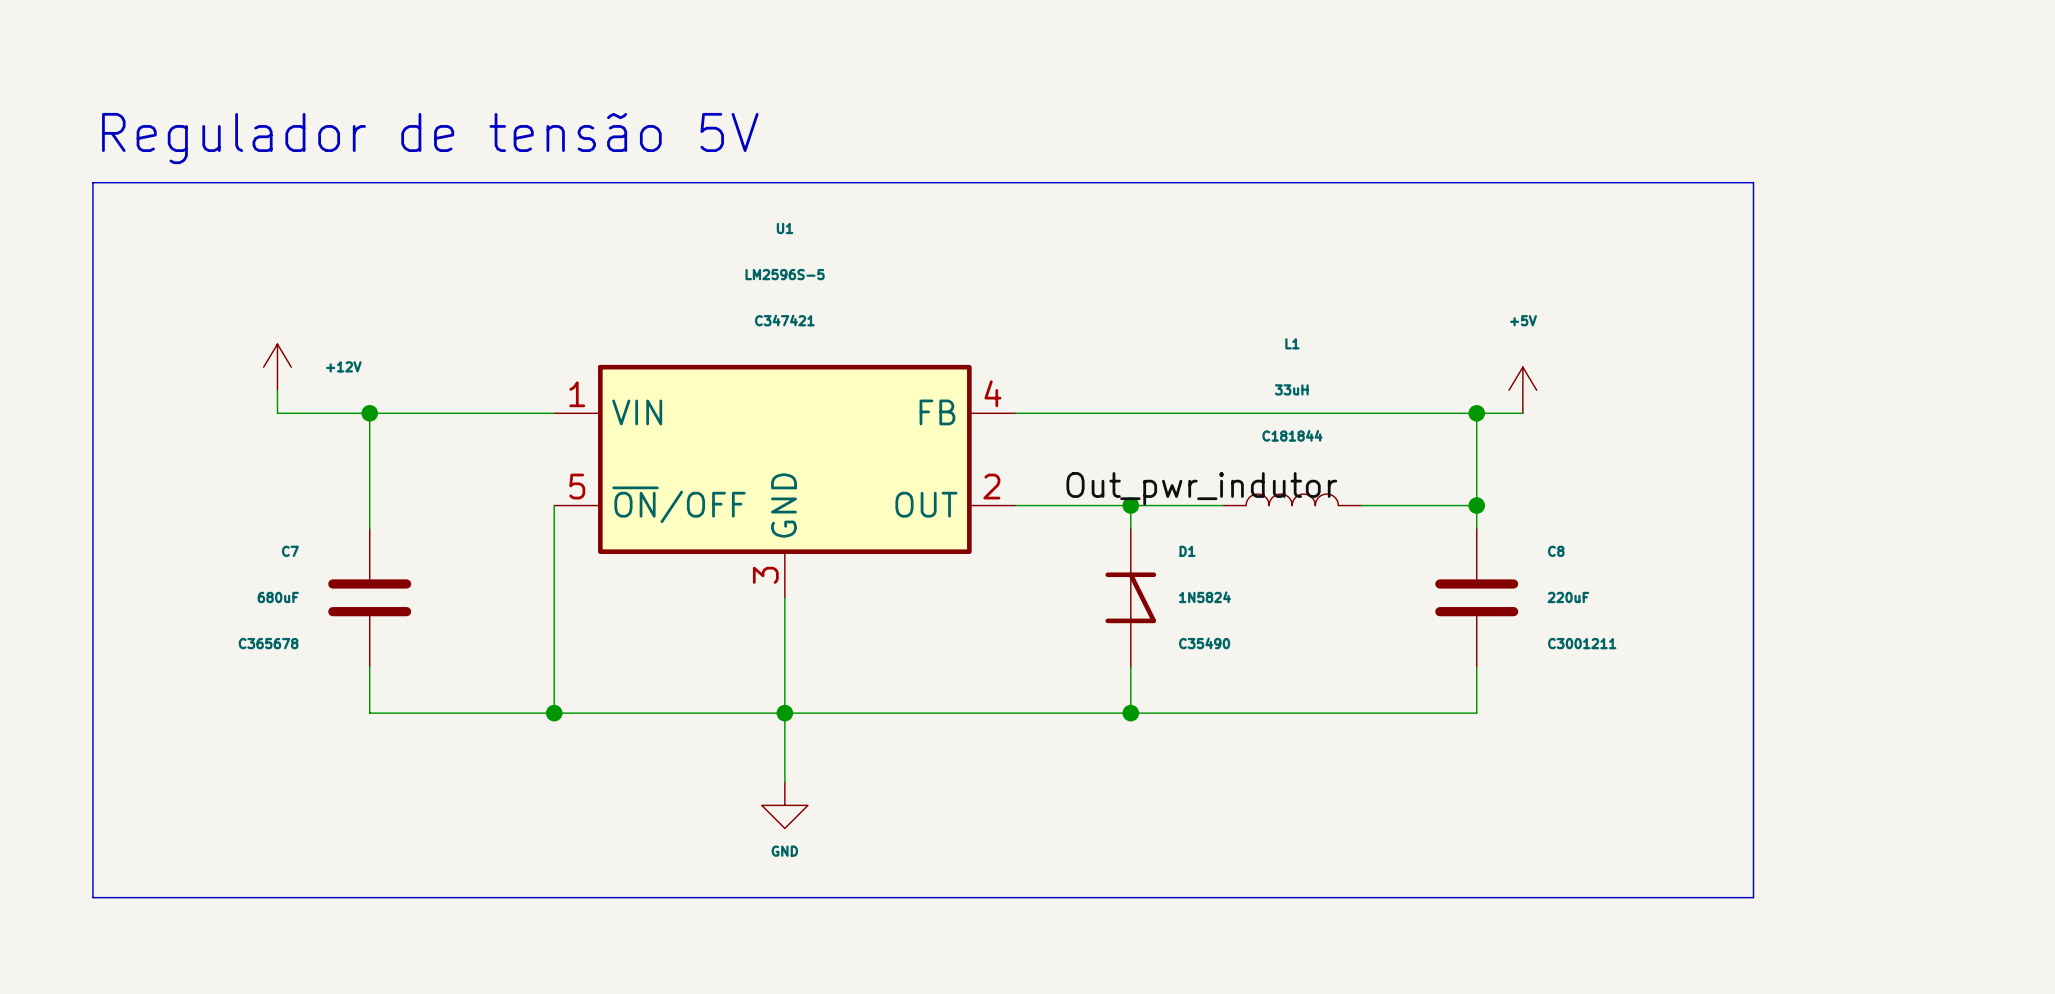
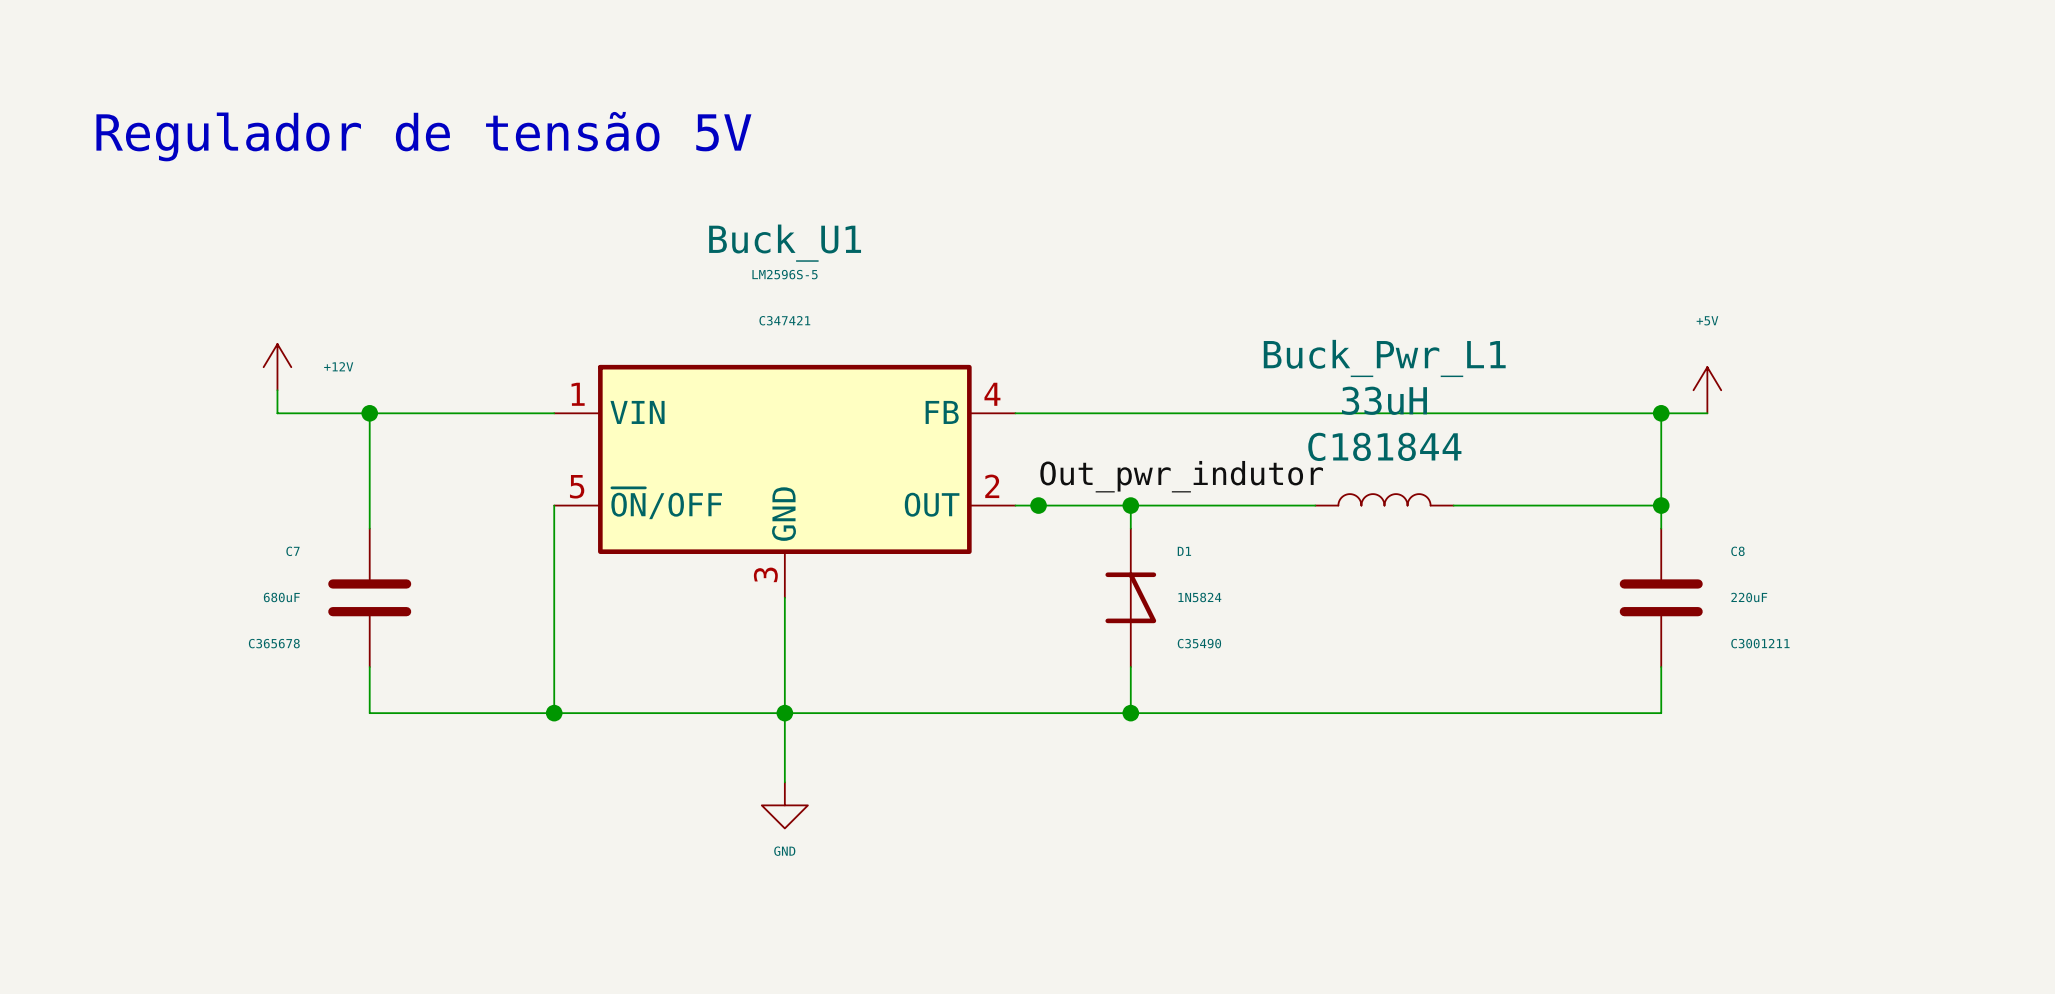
line: (92, 182) (1753, 182) (1753, 897) (92, 897) (92, 182) -> none
U1 name: U1 (785, 228) -> Buck_U1 (785, 243)
power symbol position: +5V (1522, 390) -> +5V (1707, 390)
wire: (1476, 413) (1476, 528) -> (1661, 413) (1661, 528)
junction: (1476, 413) -> none
wire: none -> (1522, 413) (1707, 413)
junction: none -> (1661, 413)
label position: Out_pwr_indutor (1201, 488) -> Out_pwr_indutor (1181, 476)
L1: 33uH (1292, 499) -> none
Buck_Pwr_L1: none -> 33uH (1384, 499)
junction: none -> (1038, 505)
wire: (1361, 505) (1453, 505) -> (1223, 505) (1315, 505)
wire: none -> (1476, 505) (1661, 505)
junction: (1476, 505) -> none
junction: none -> (1661, 505)
C8 position: (1476, 597) -> (1661, 597)
wire: (1476, 667) (1476, 713) -> (1661, 667) (1661, 713) (1476, 713)

